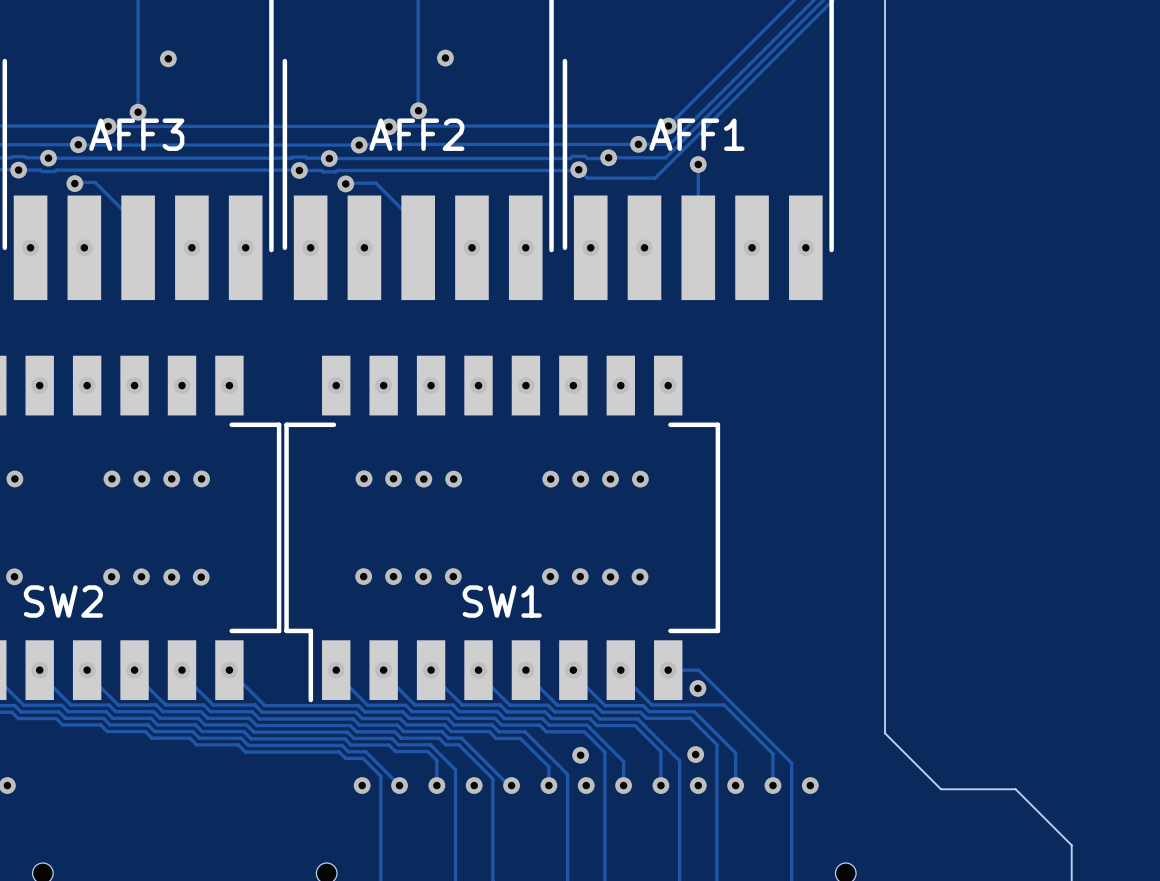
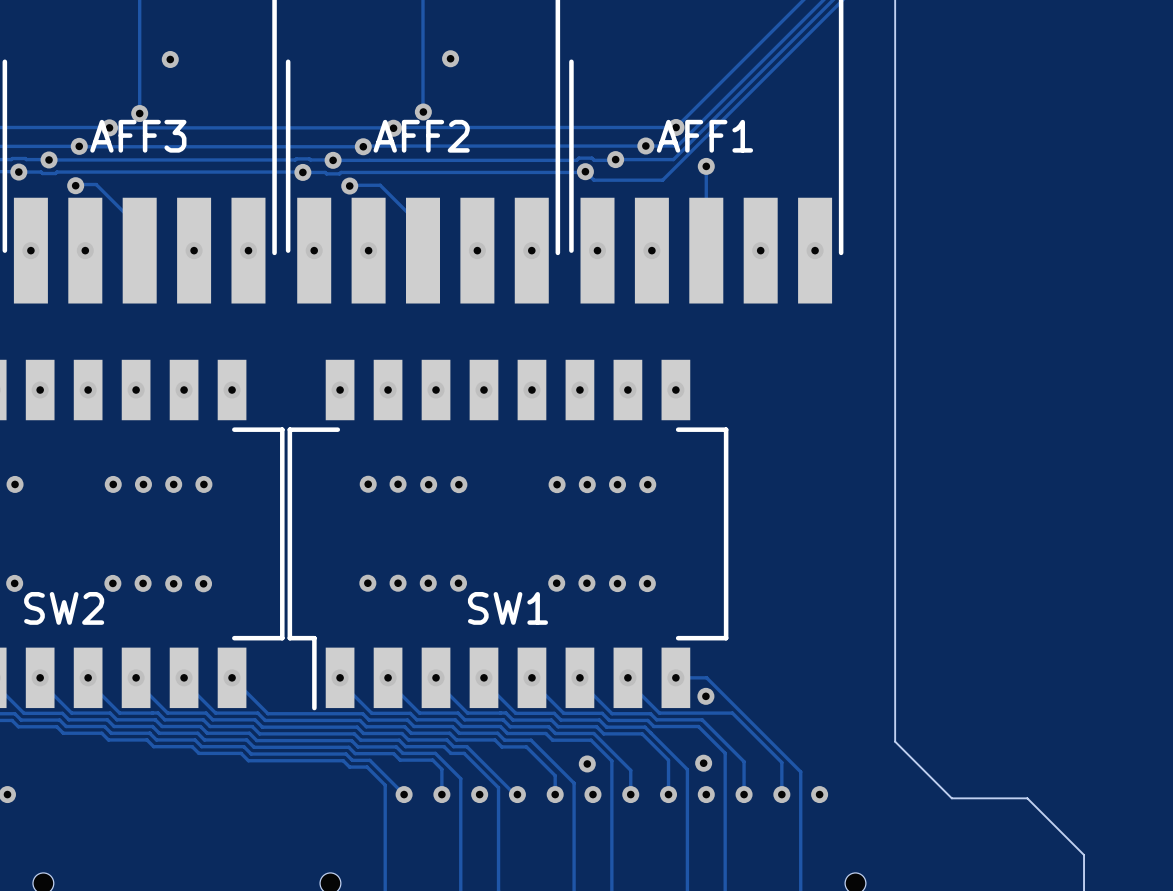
via: (362, 785) -> none

